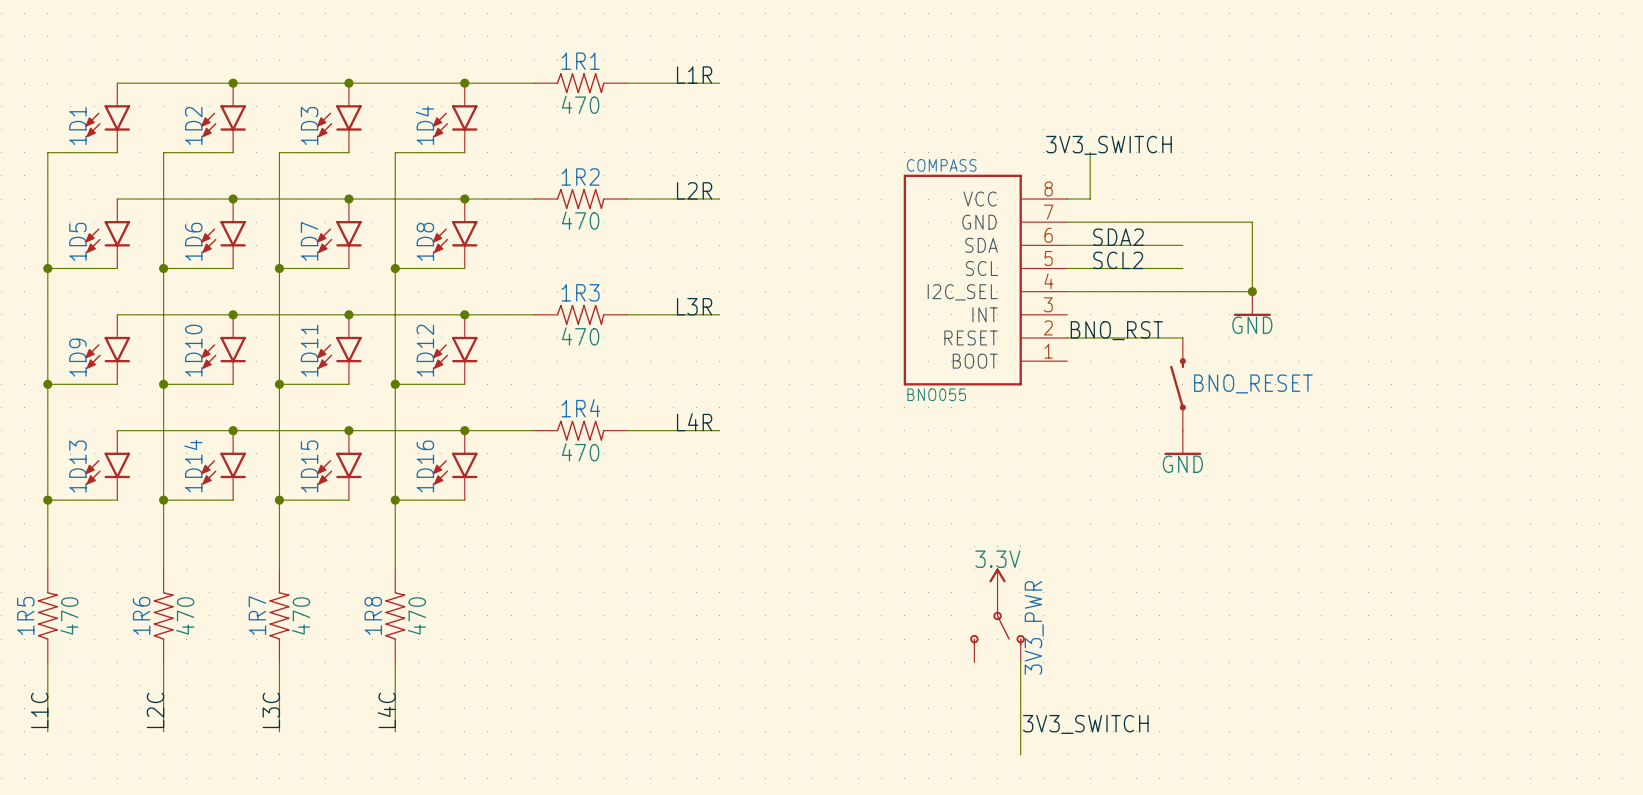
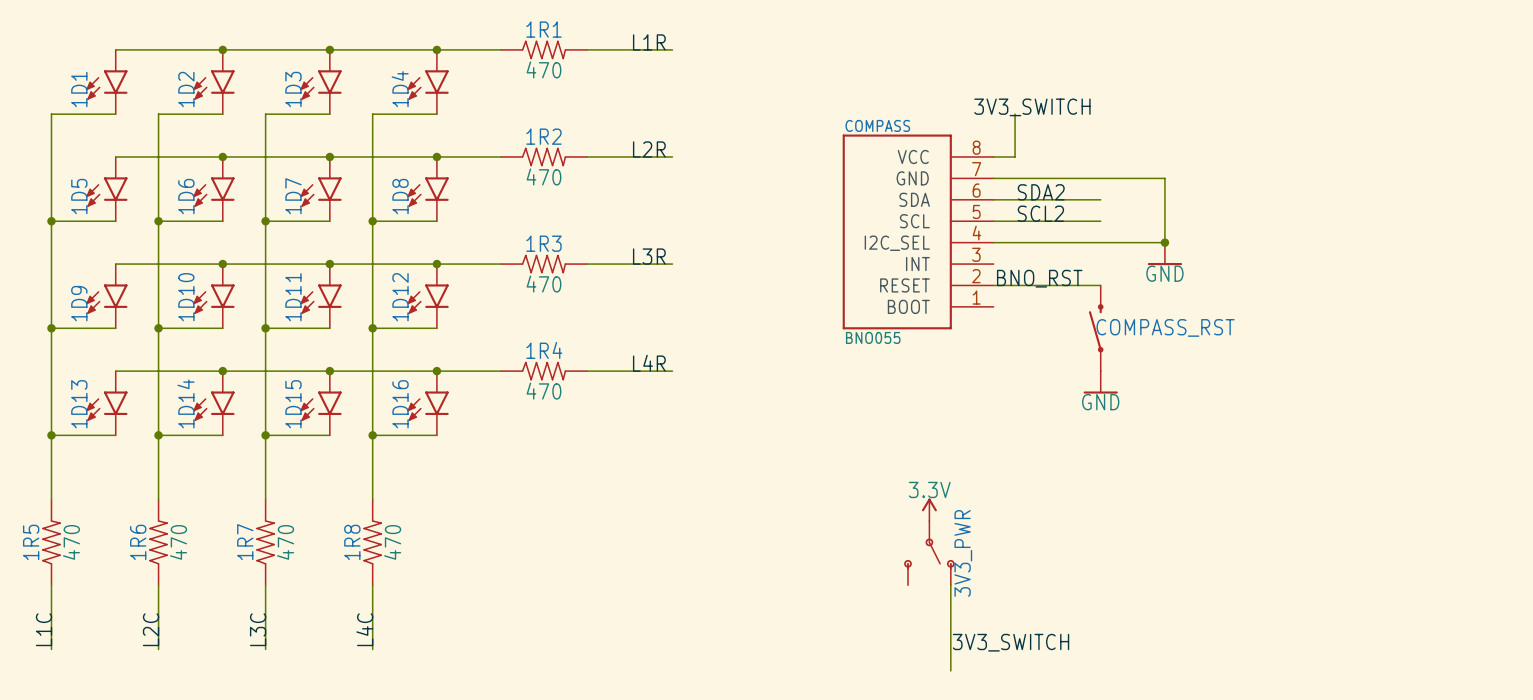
BNO_RESET name: BNO_RESET (1253, 383) -> COMPASS_RST (1165, 327)

